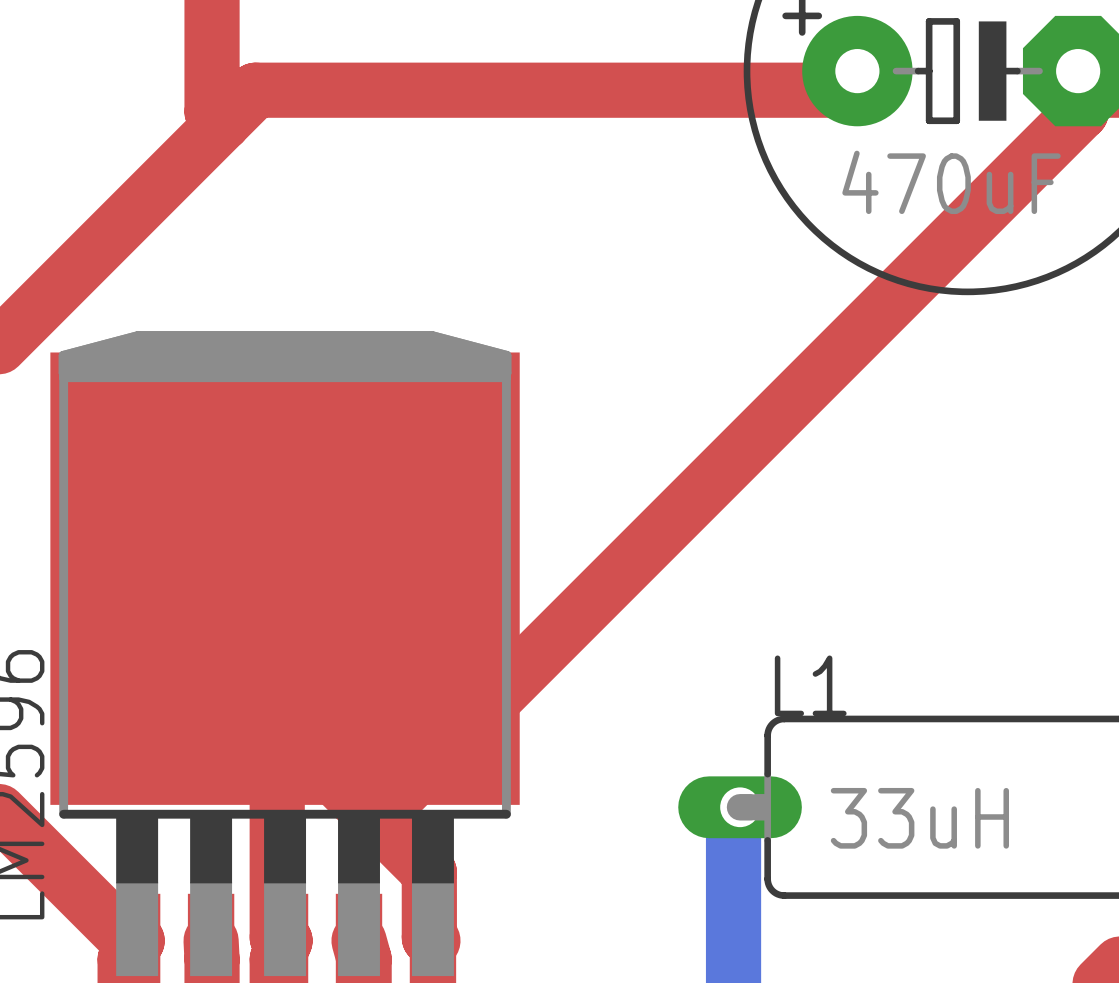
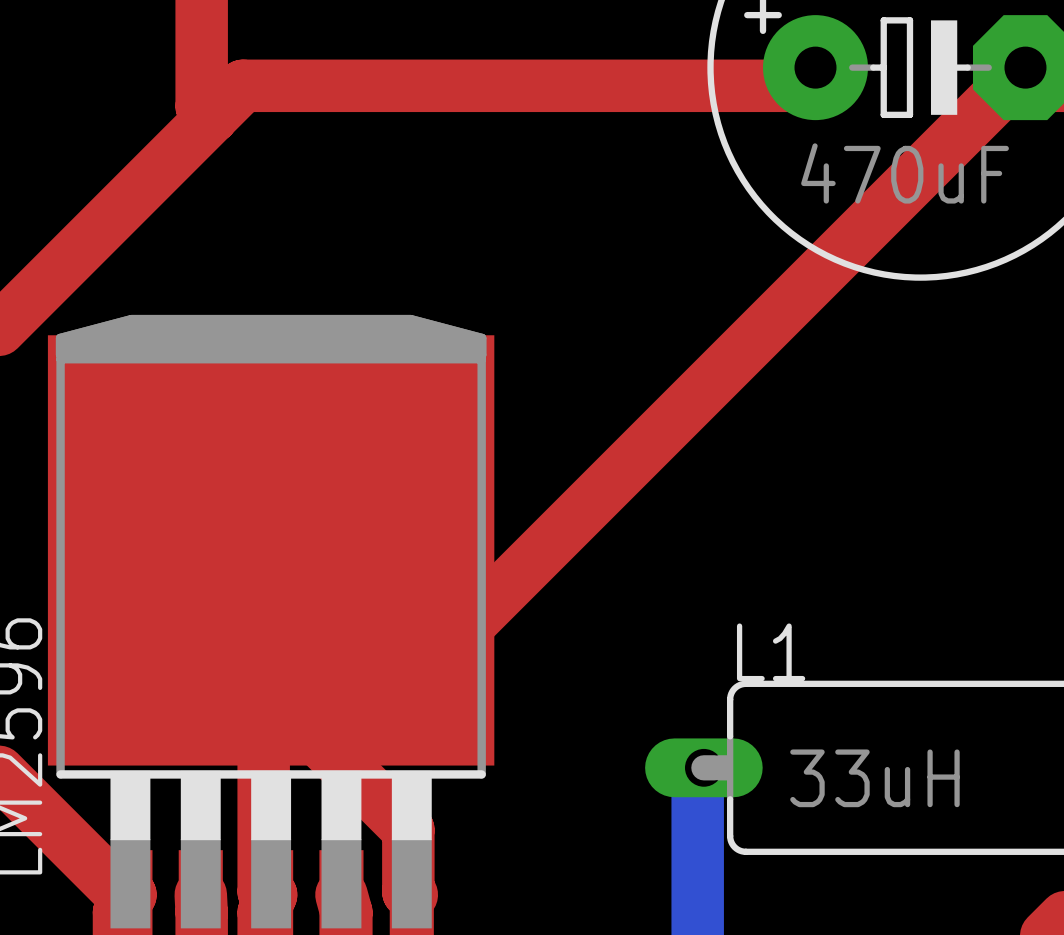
top track: (1078, 71) (1081, 111) (375, 818) -> (1025, 67) (346, 747) (271, 550)

